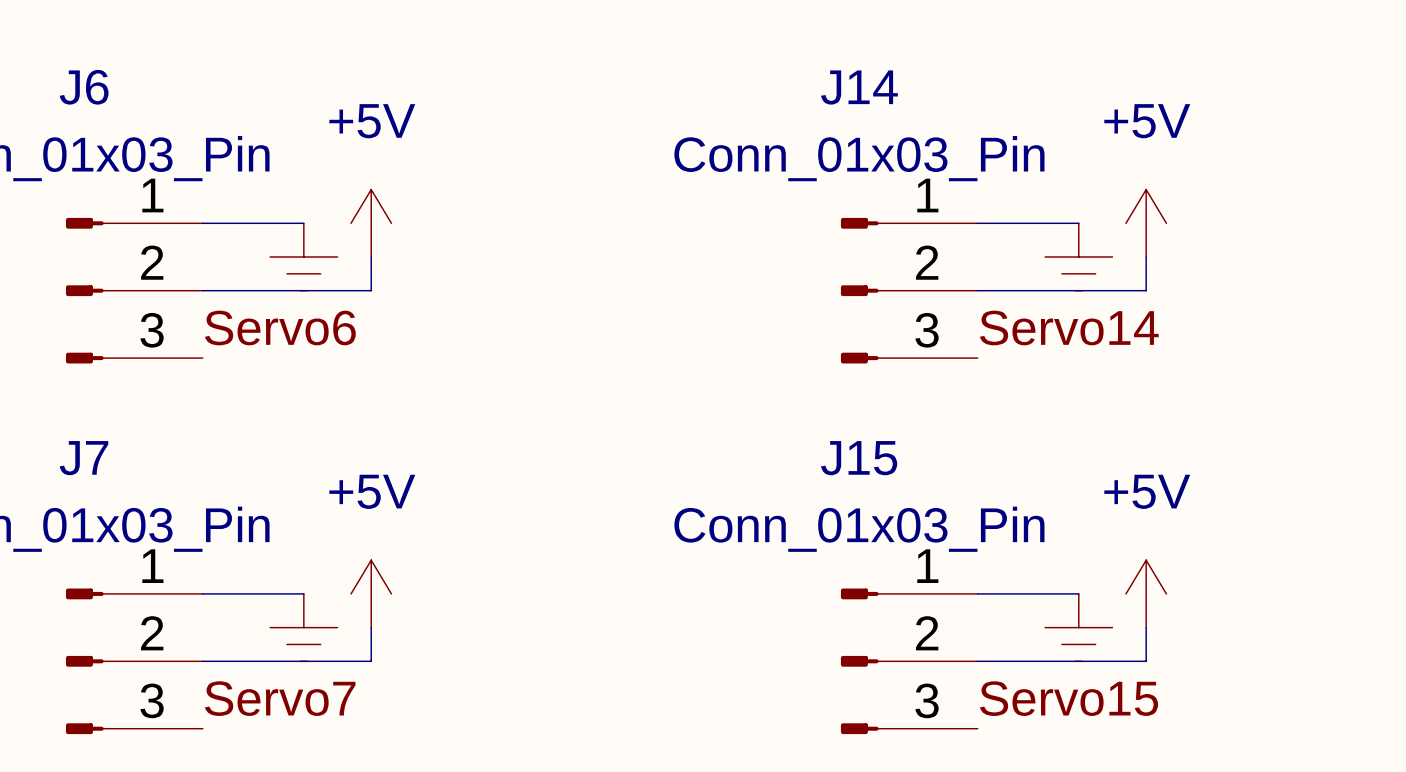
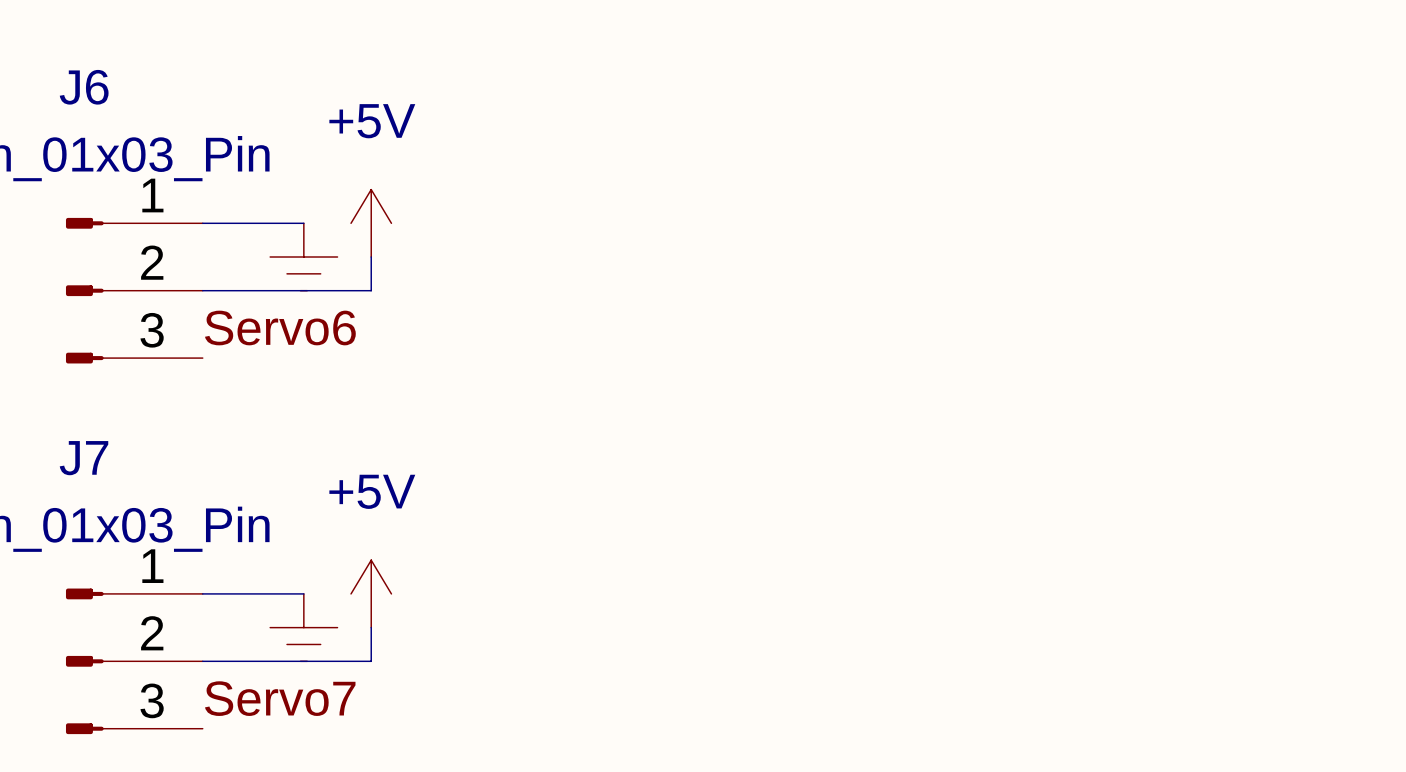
wire: (977, 223) (1078, 223) -> none
power symbol: +5V (1146, 223) -> none
power symbol: (1078, 257) -> none
wire: (1146, 257) (1146, 290) (977, 290) -> none
J14: Conn_01x03_Pin (909, 290) -> none
label: Servo14 (1069, 328) -> none
wire: (977, 593) (1078, 593) -> none
power symbol: +5V (1146, 593) -> none
power symbol: (1078, 627) -> none
wire: (1146, 627) (1146, 661) (977, 661) -> none
J15: Conn_01x03_Pin (909, 661) -> none
label: Servo15 (1069, 698) -> none

